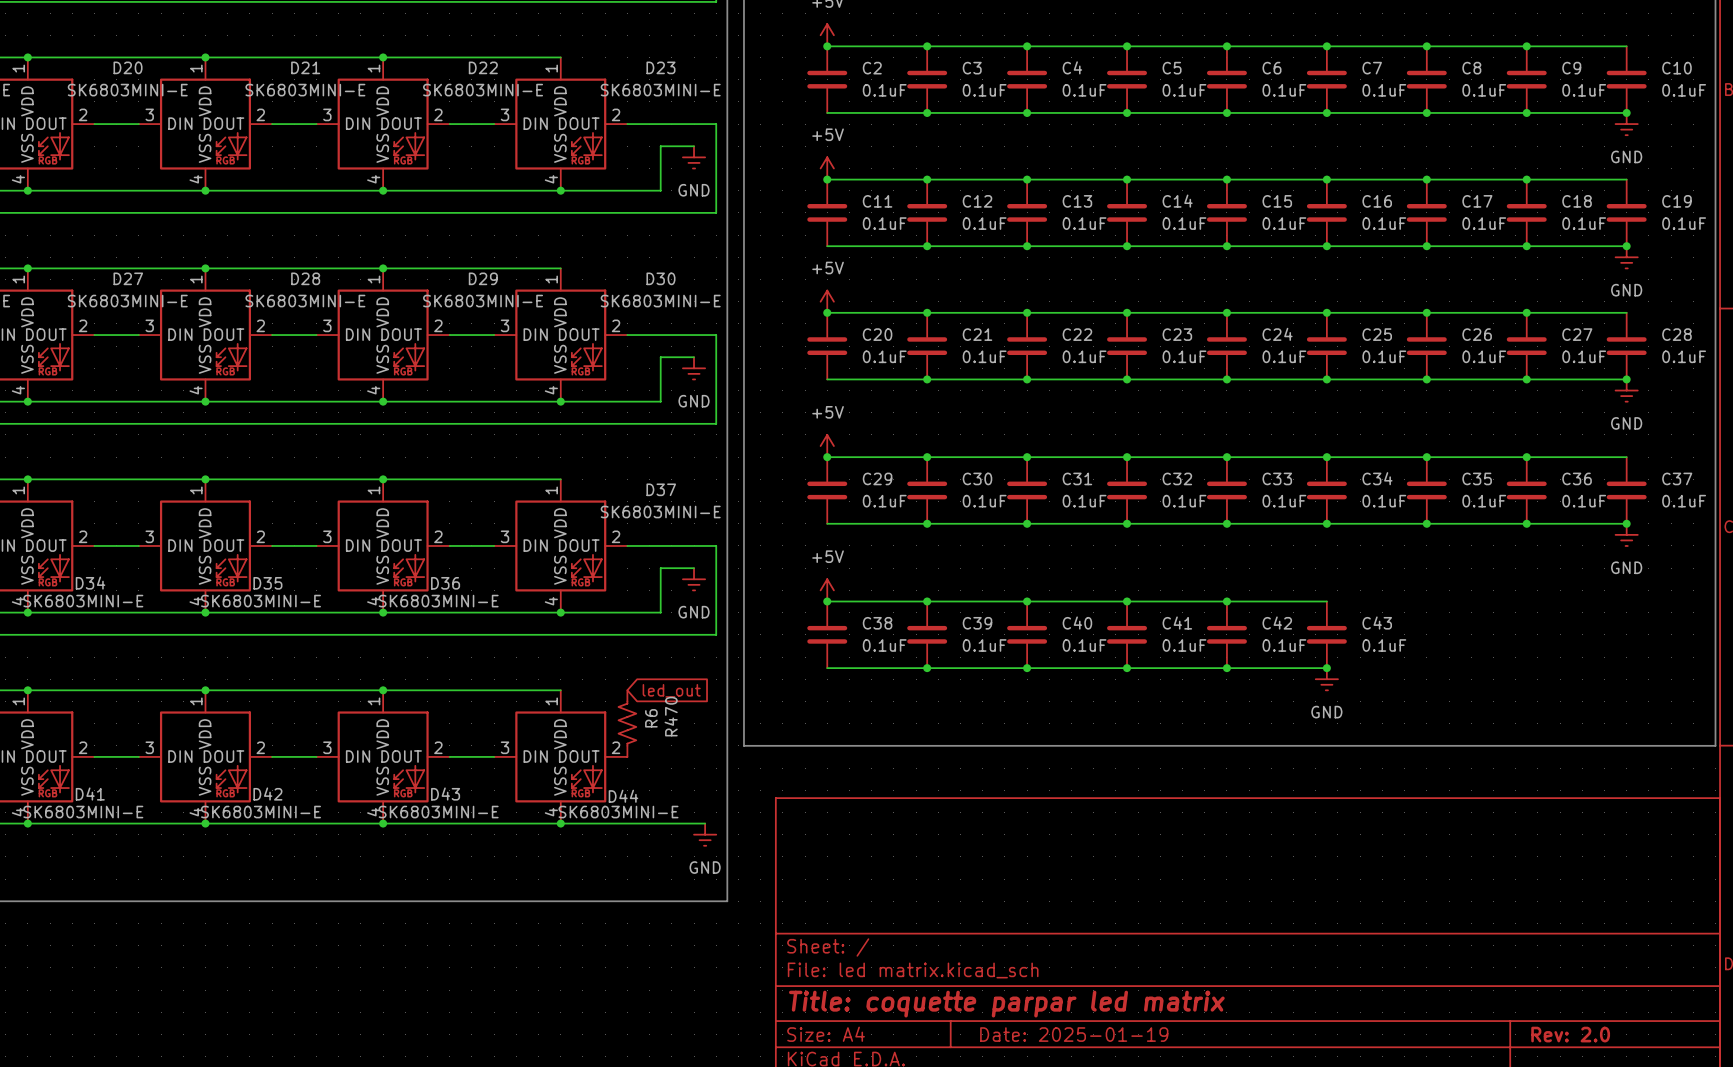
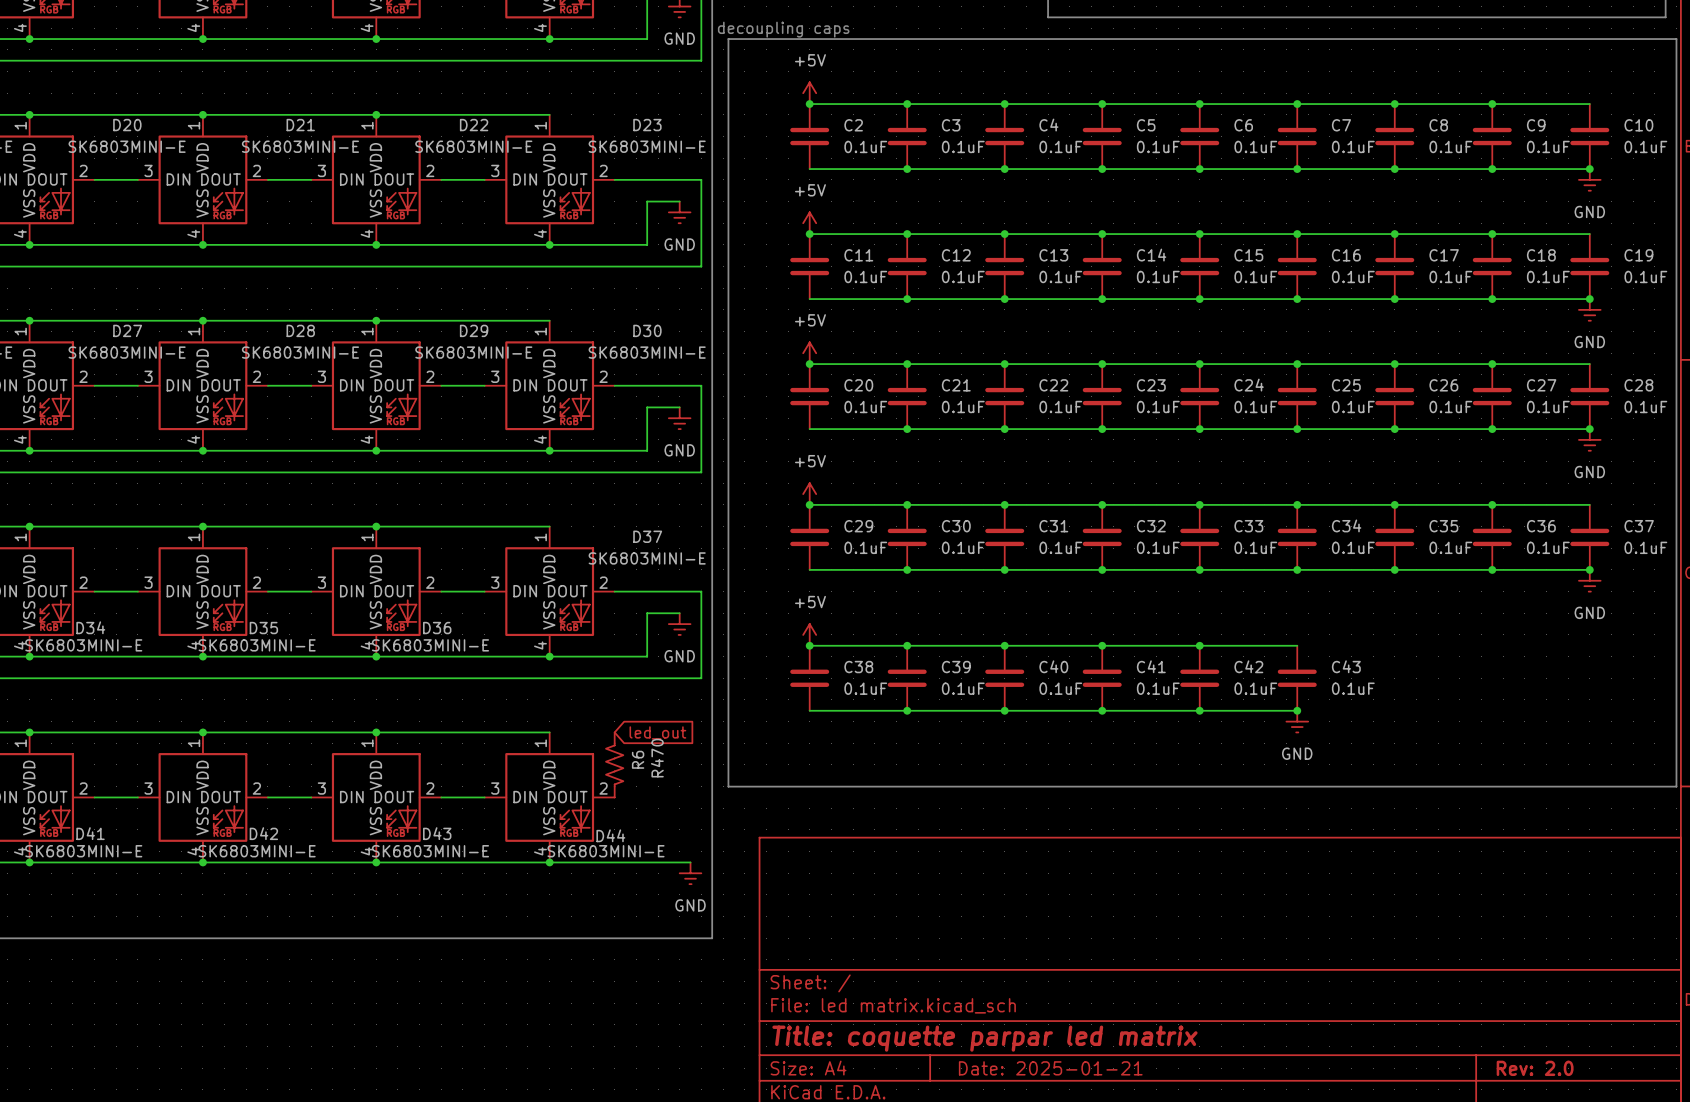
title block: Date: 2025-01-19 (1074, 1034) -> Date: 2025-01-21 (1050, 1068)

